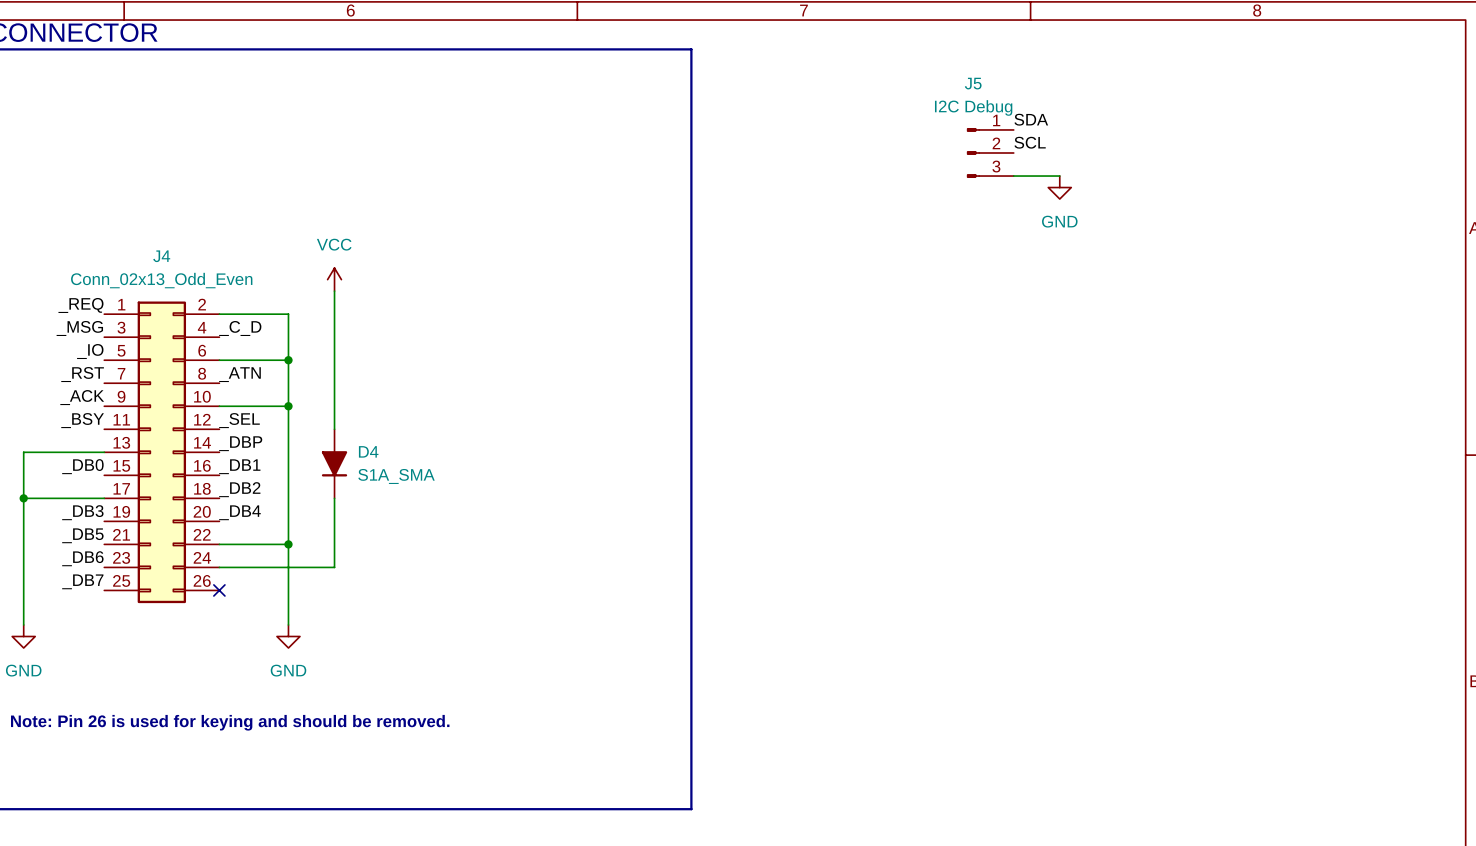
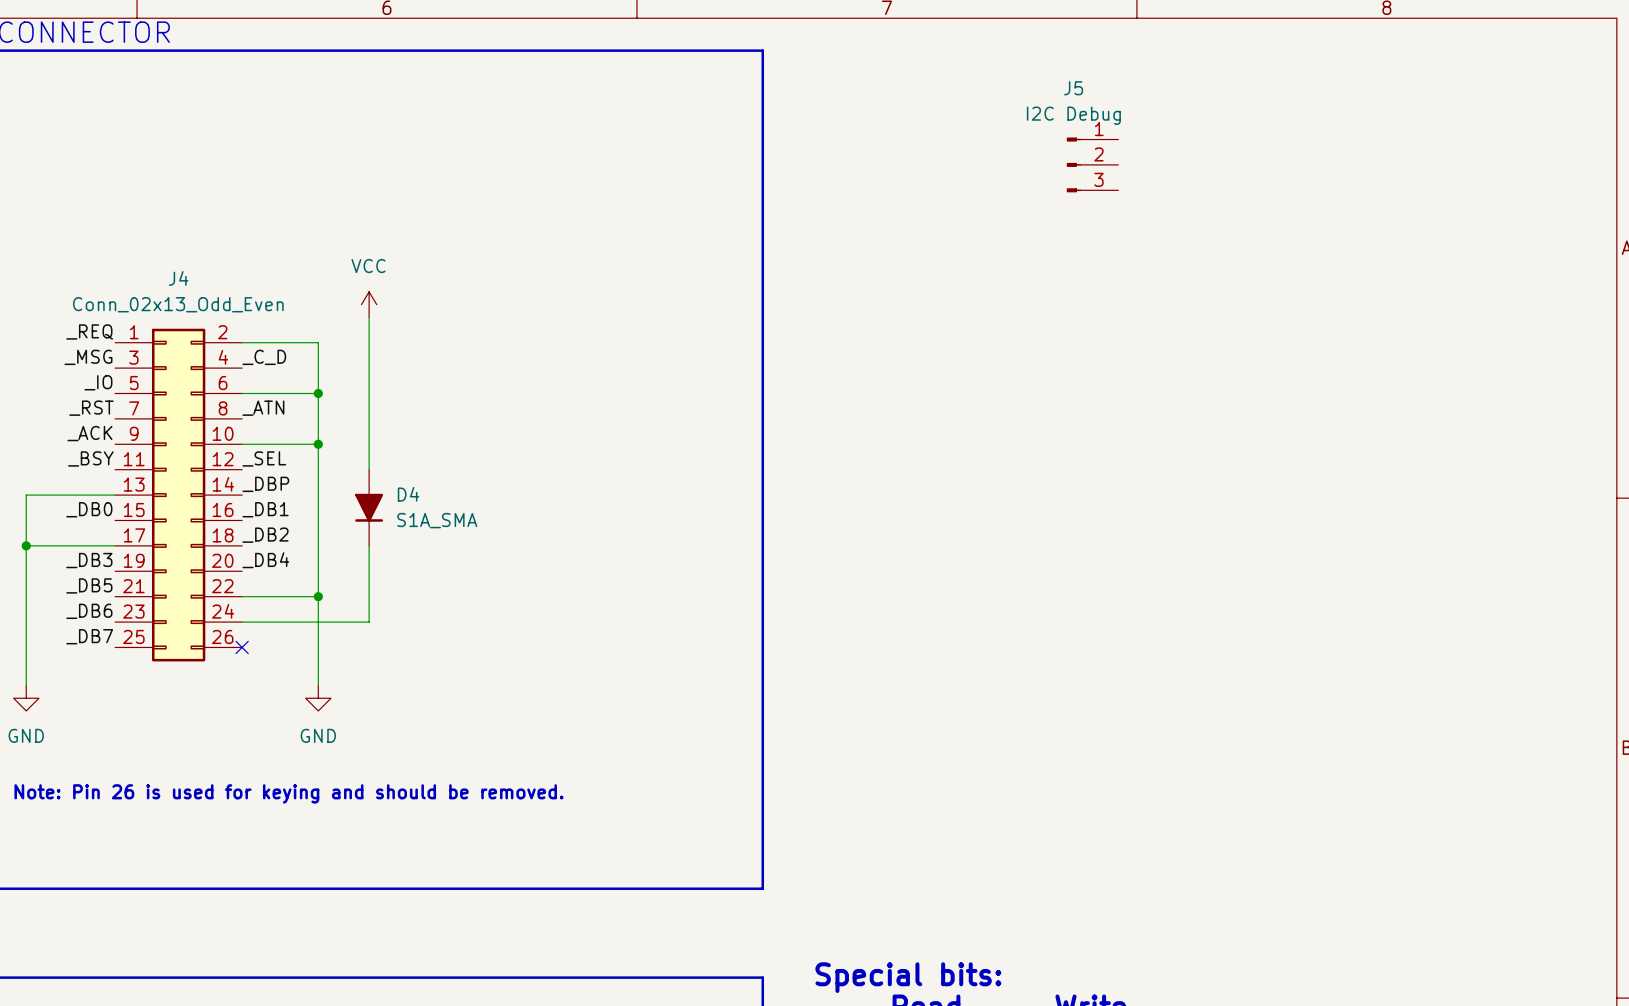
label: SDA (1031, 119) -> none
label: SCL (1030, 142) -> none
wire: (1013, 176) (1059, 176) -> none
power symbol: GND (1059, 187) -> none

